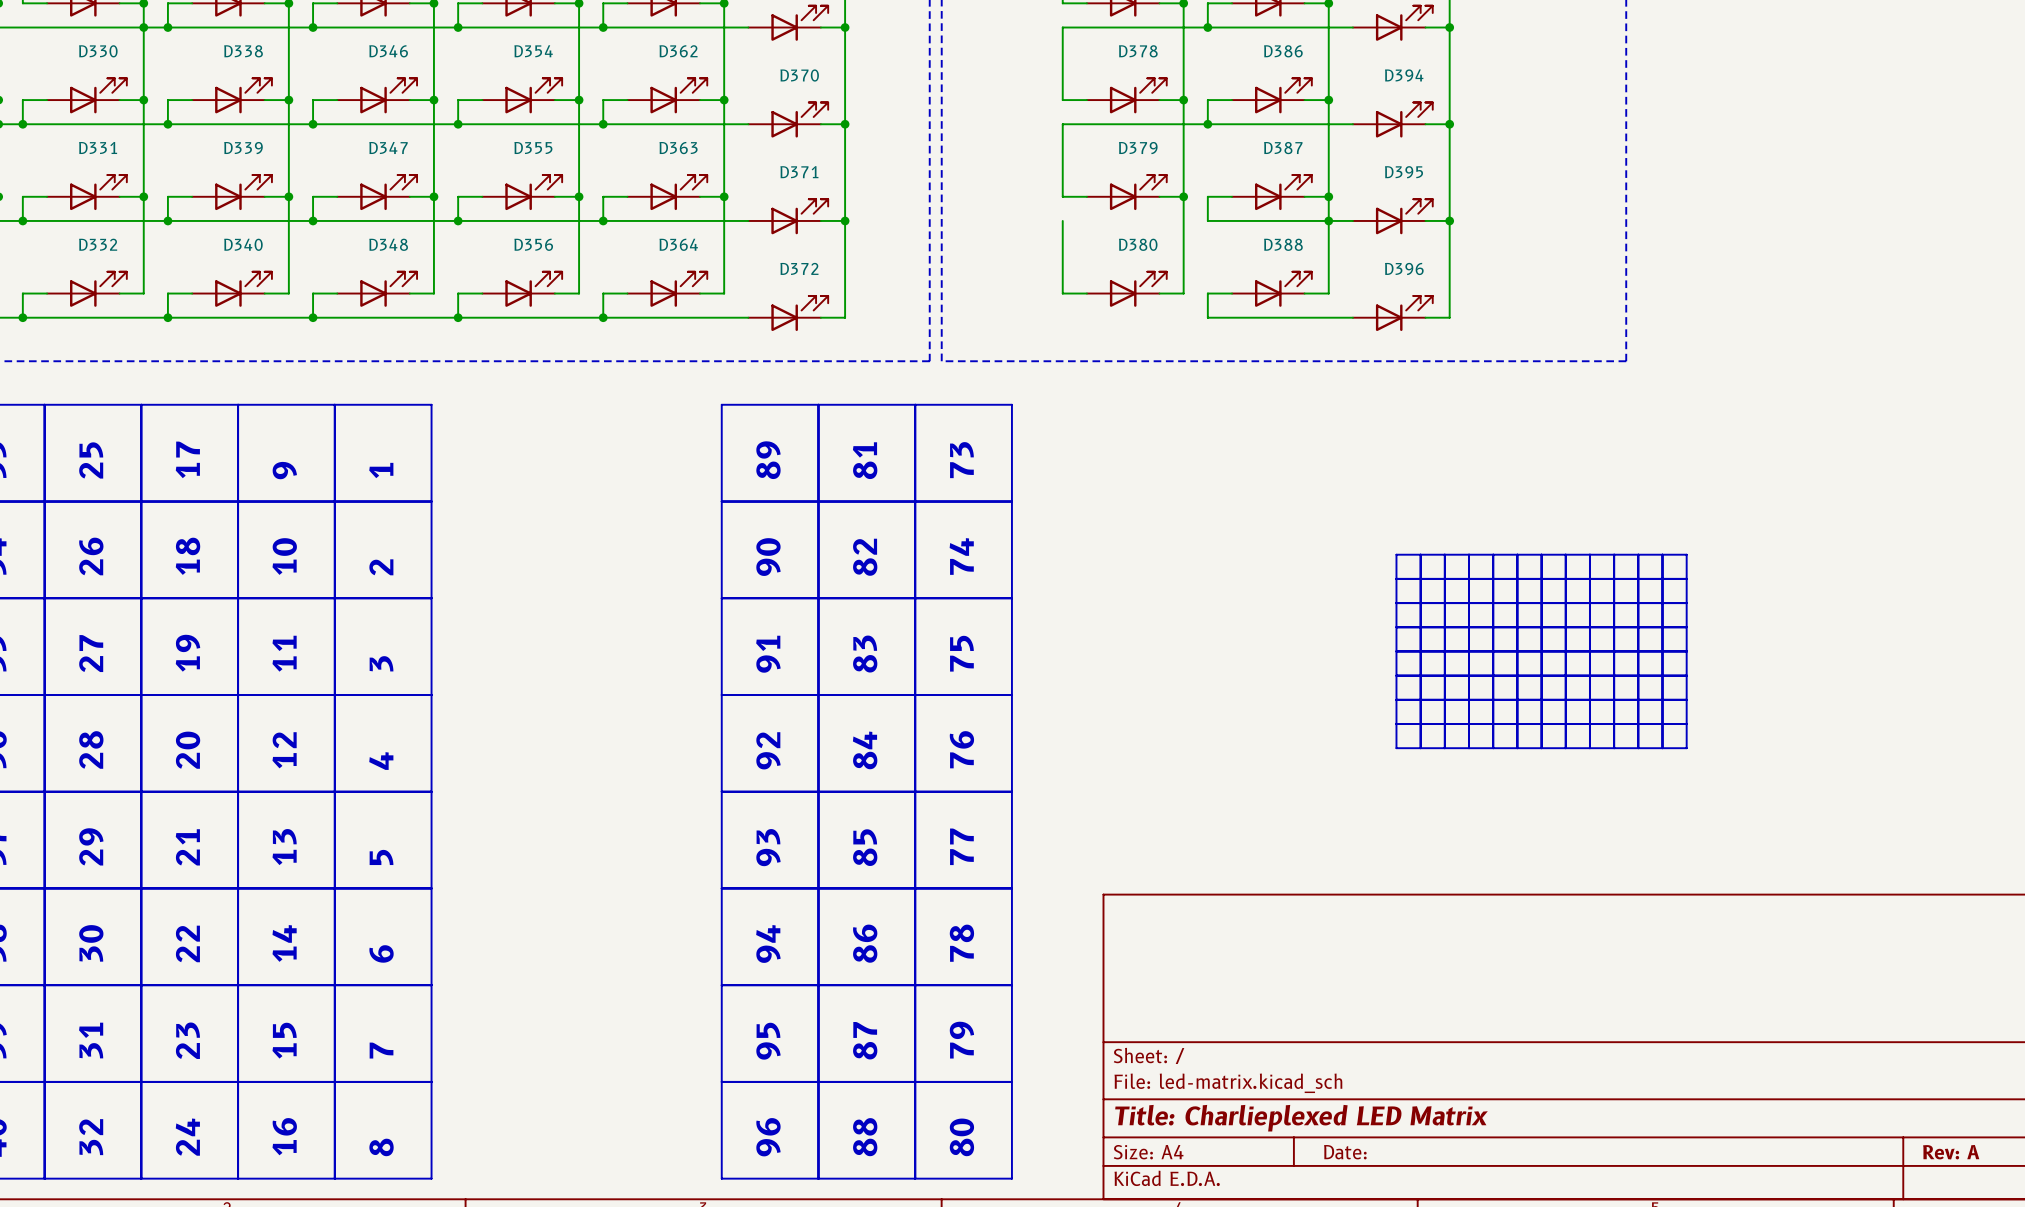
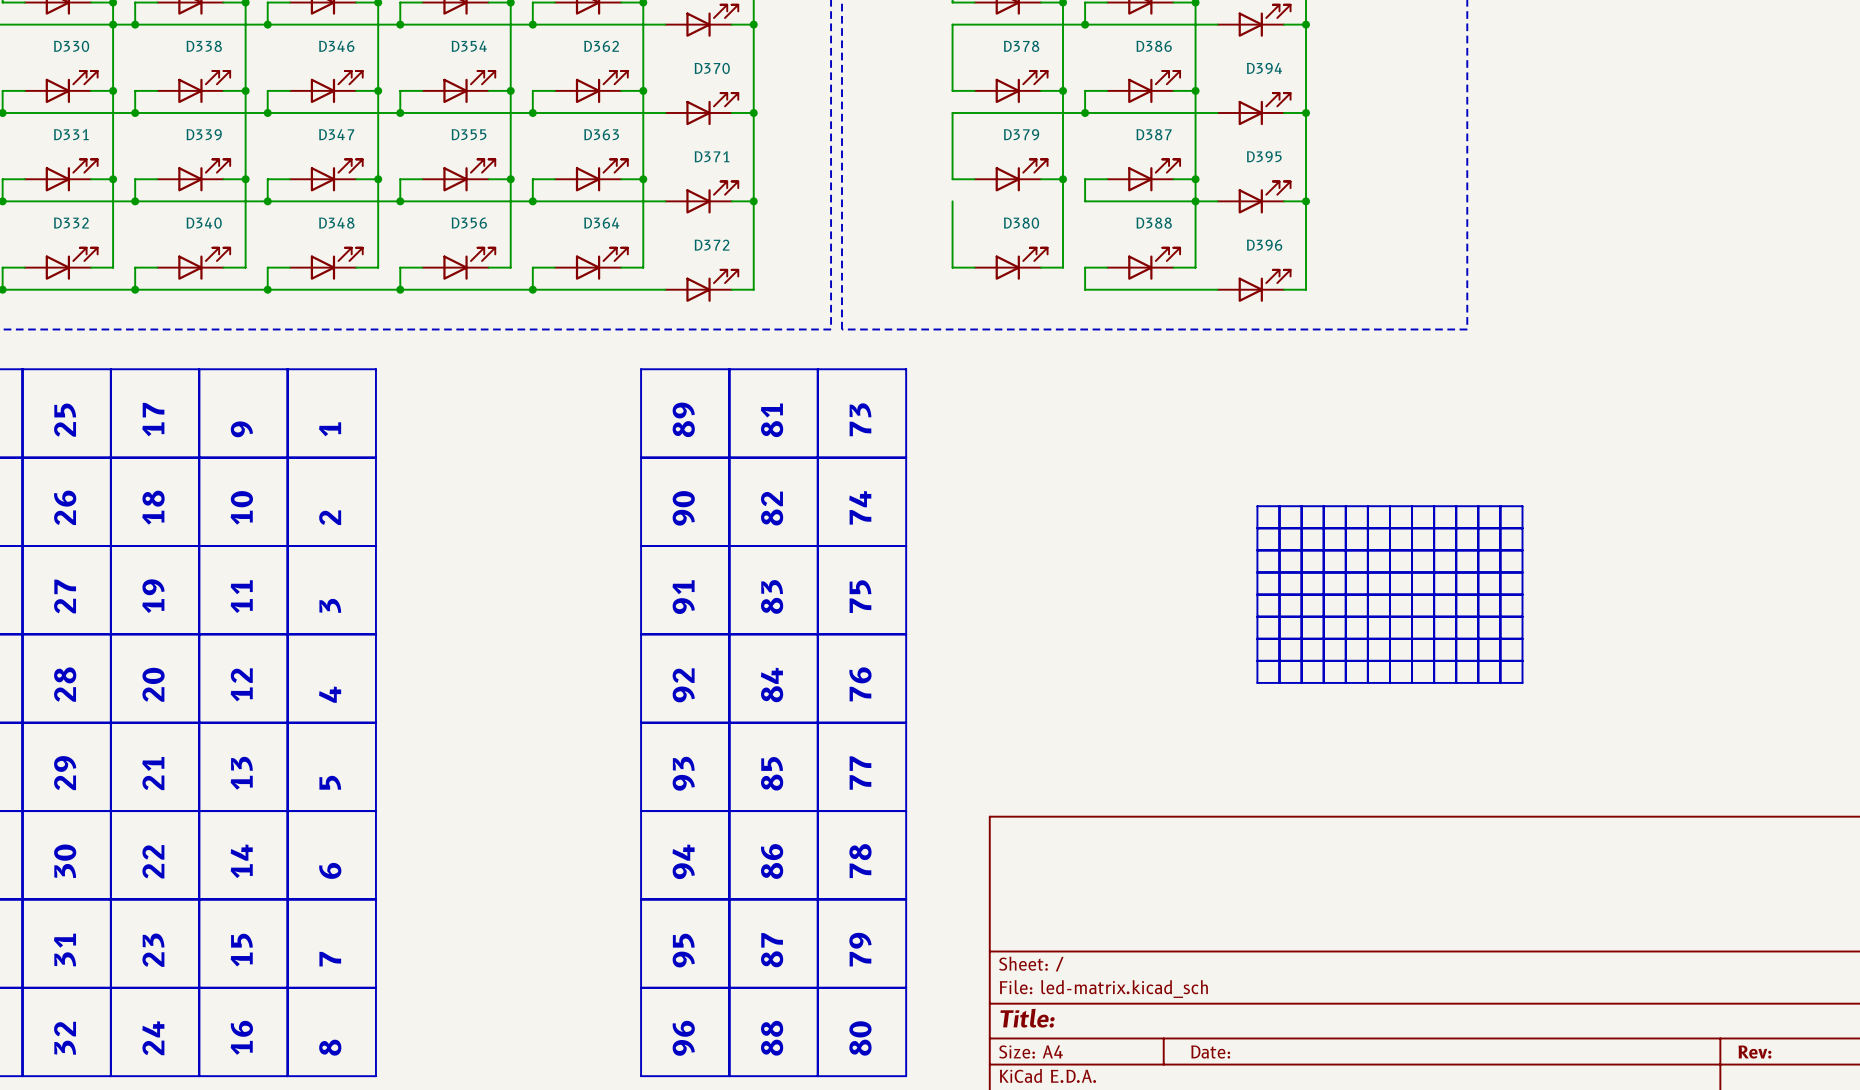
title block: Title: Charlieplexed LED Matrix (1301, 1118) -> Title: (1027, 1018)
title block: Rev: A (1951, 1152) -> Rev: (1754, 1052)

